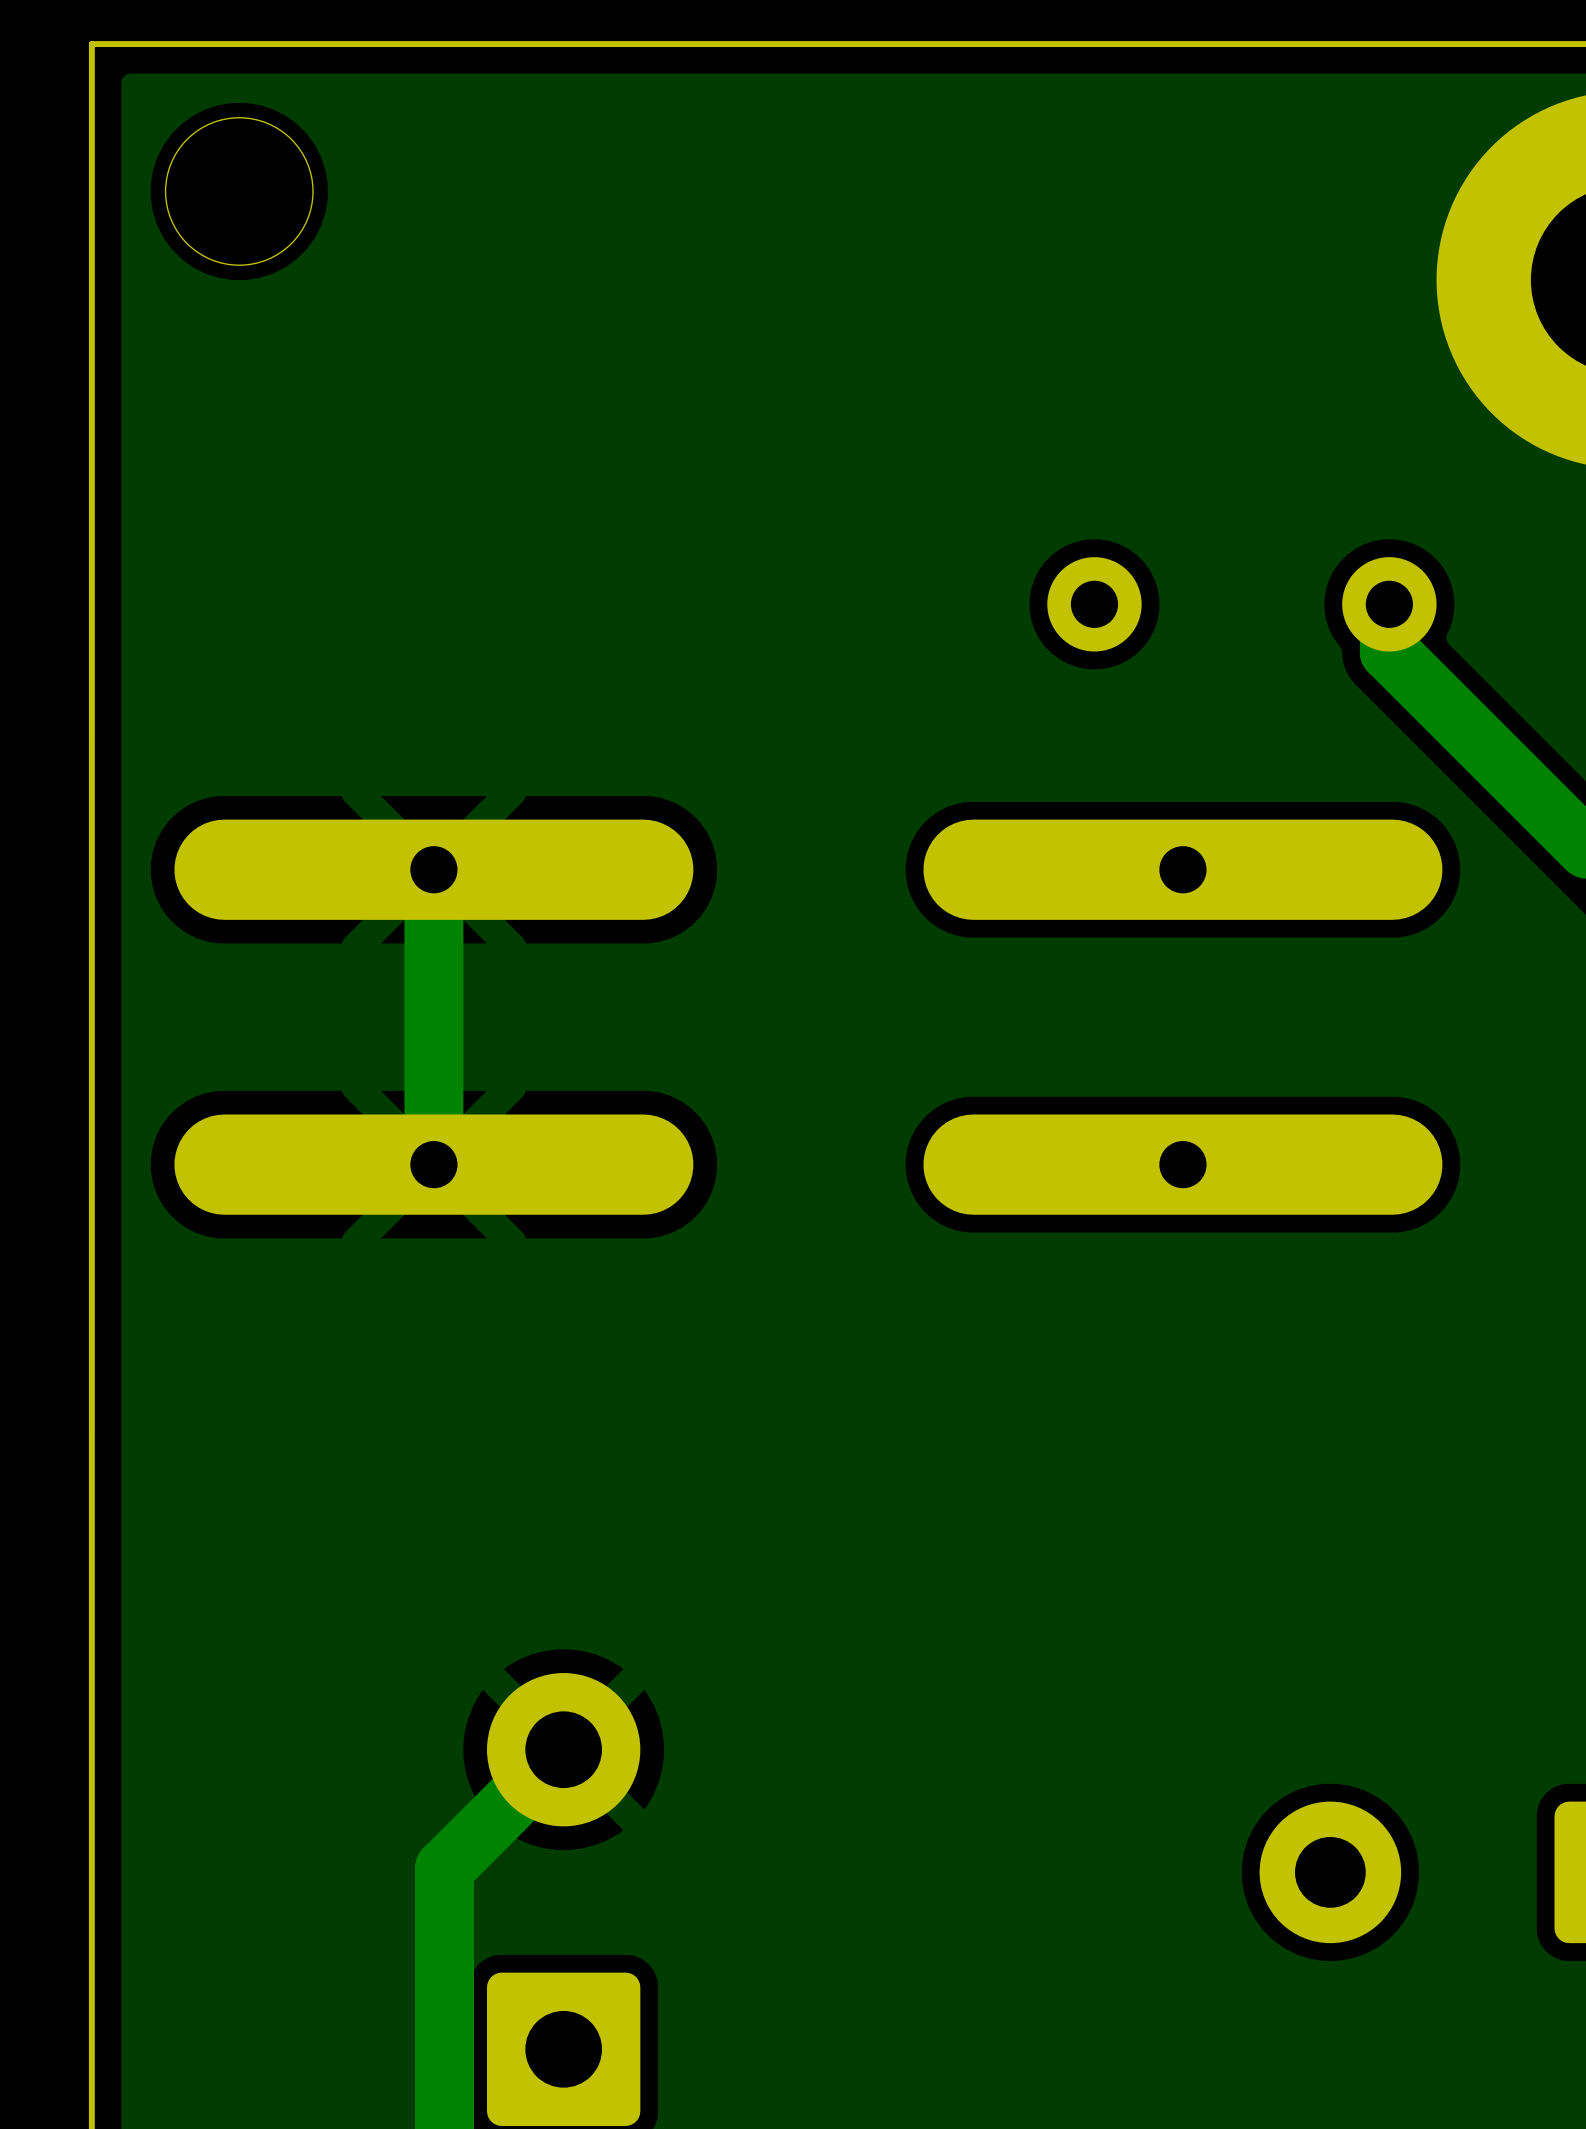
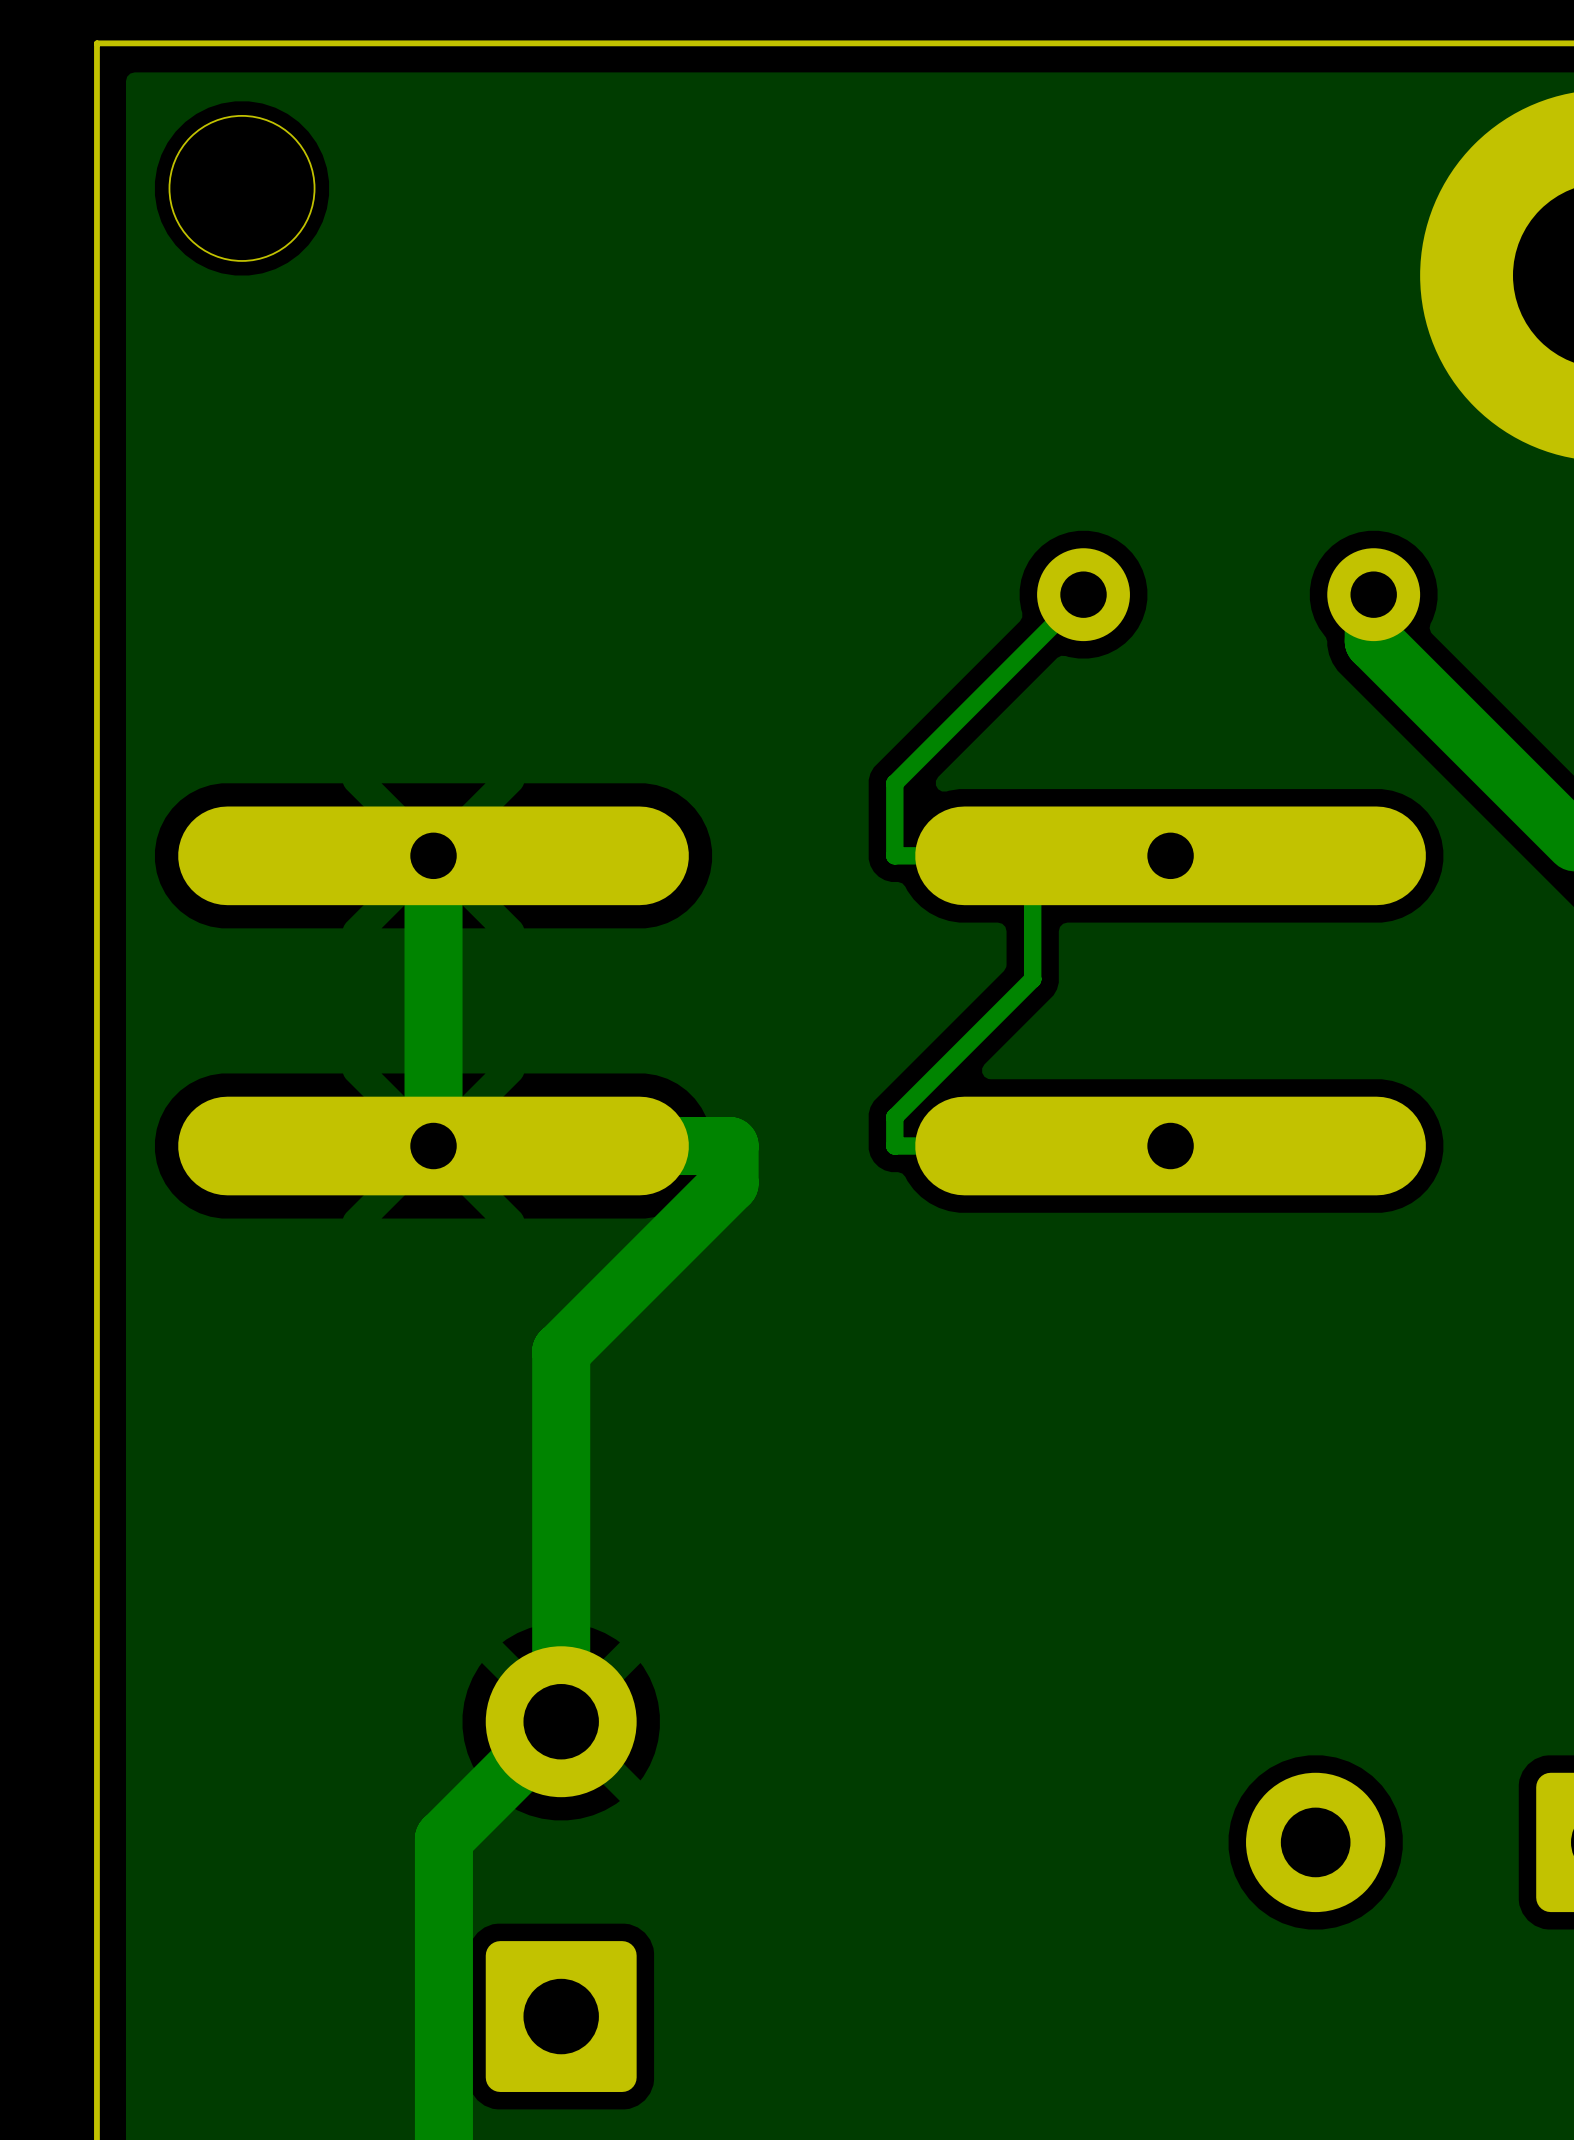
track: none -> (1083, 594) (894, 783) (894, 855) (1170, 855)
track: none -> (1032, 855) (1032, 979) (894, 1117) (894, 1146) (1170, 1146)
track: none -> (433, 1146) (729, 1146) (729, 1183) (561, 1351) (561, 1721)

